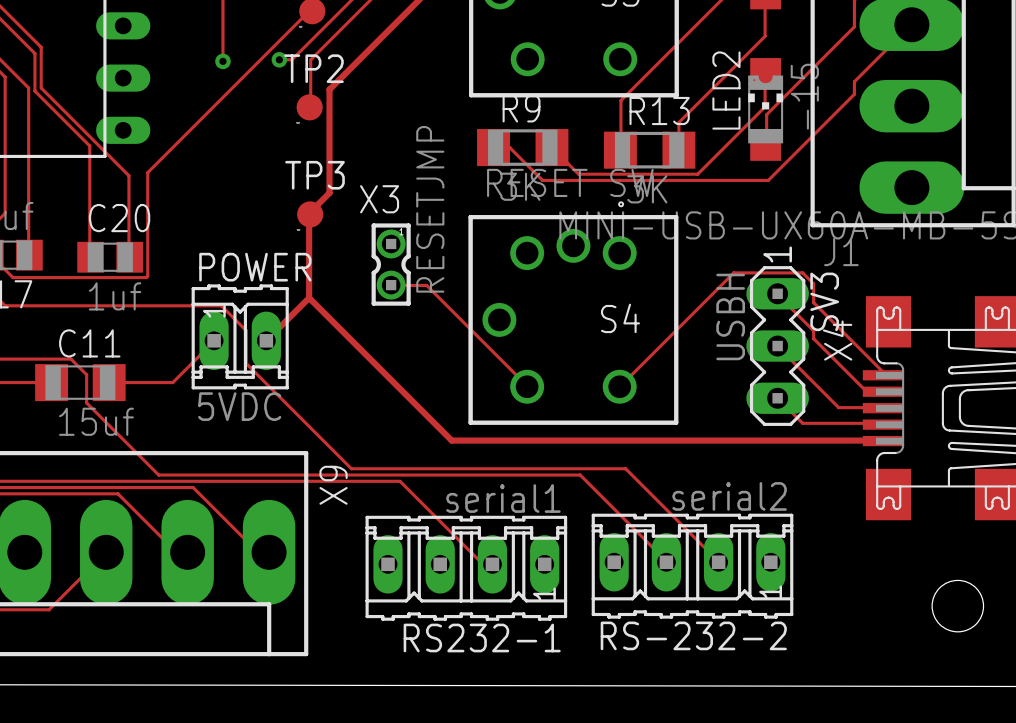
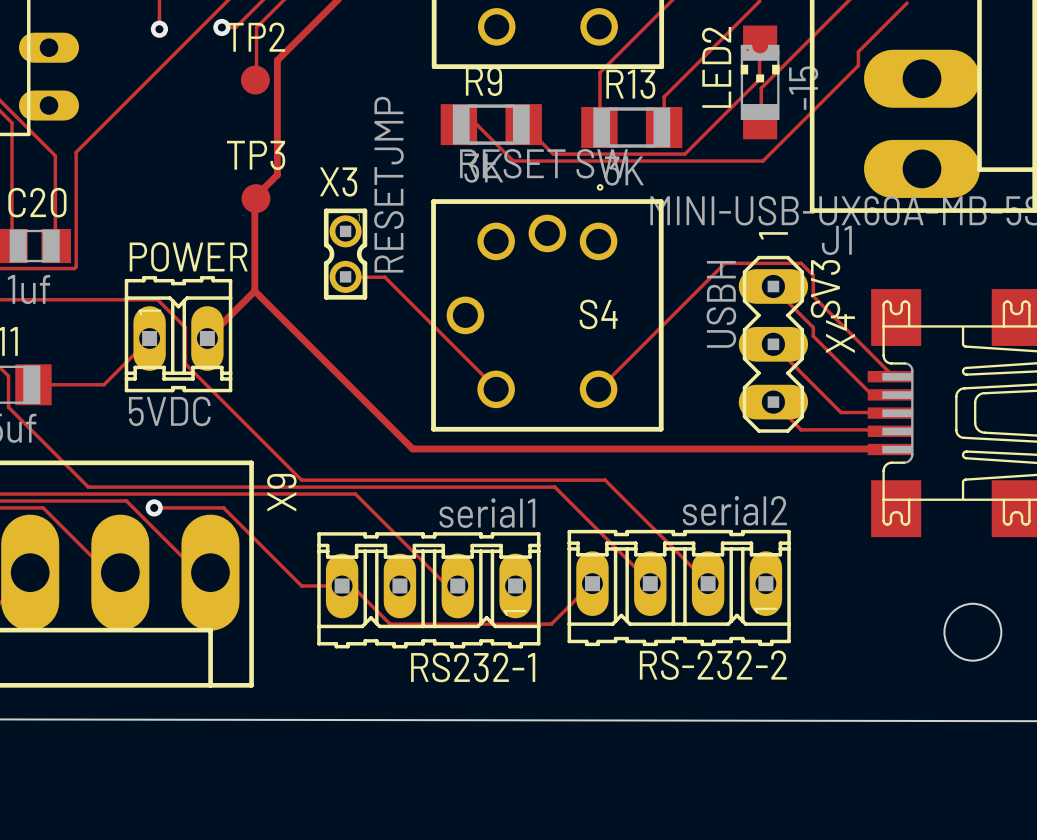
track: none -> (154, 507) (223, 507) (301, 585) (351, 585) (390, 624) (551, 624) (592, 583)
via: none -> (154, 507)

